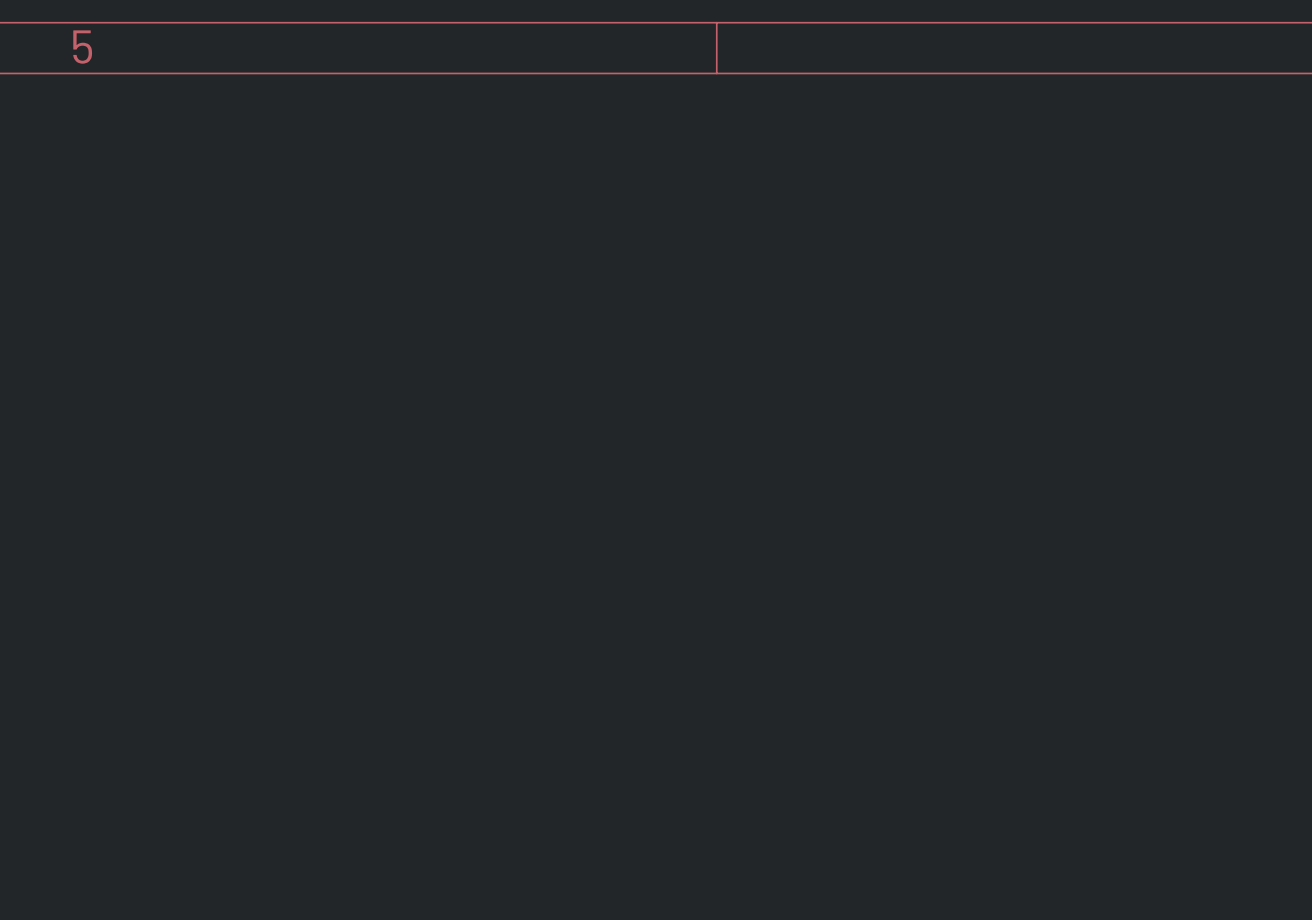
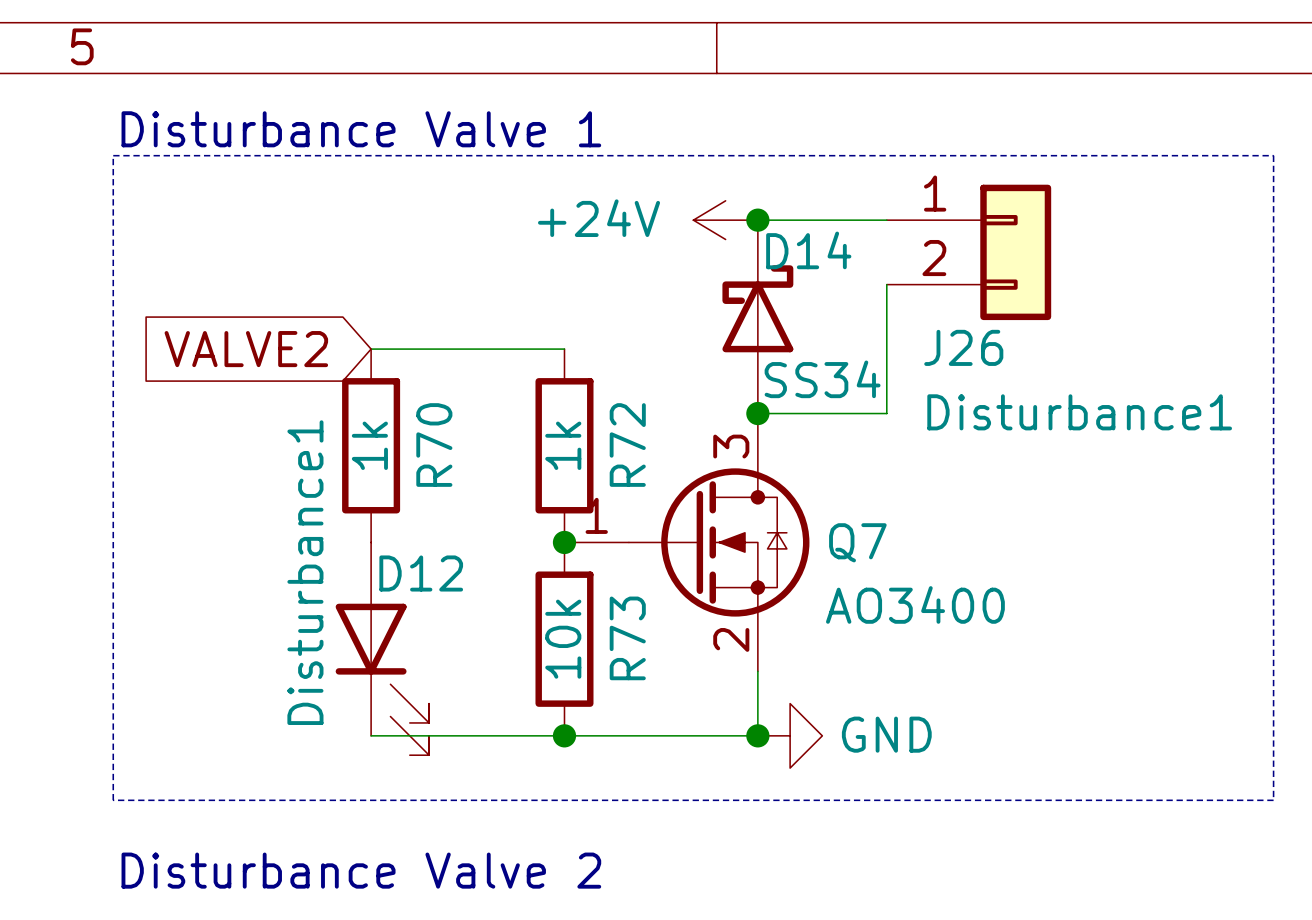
text: none -> Disturbance Valve 1 (361, 129)
line: none -> (113, 155) (1273, 155) (1273, 800) (113, 800) (113, 155)
power symbol: none -> +24V (725, 220)
wire: none -> (757, 220) (886, 220)
junction: none -> (757, 220)
J26: none -> Disturbance1 (968, 252)
wire: none -> (886, 284) (886, 413) (757, 413)
D14: none -> SS34 (757, 316)
global label: none -> VALVE2 (246, 349)
wire: none -> (371, 349) (564, 349)
junction: none -> (757, 413)
R70: none -> 1k (371, 445)
R72: none -> 1k (564, 445)
junction: none -> (564, 542)
Q7: none -> AO3400 (686, 542)
R73: none -> 10k (564, 639)
D12: none -> Disturbance1 (382, 648)
wire: none -> (757, 671) (757, 735) (371, 735)
junction: none -> (564, 735)
junction: none -> (757, 735)
power symbol: none -> GND (790, 735)
text: none -> Disturbance Valve 2 (361, 870)

